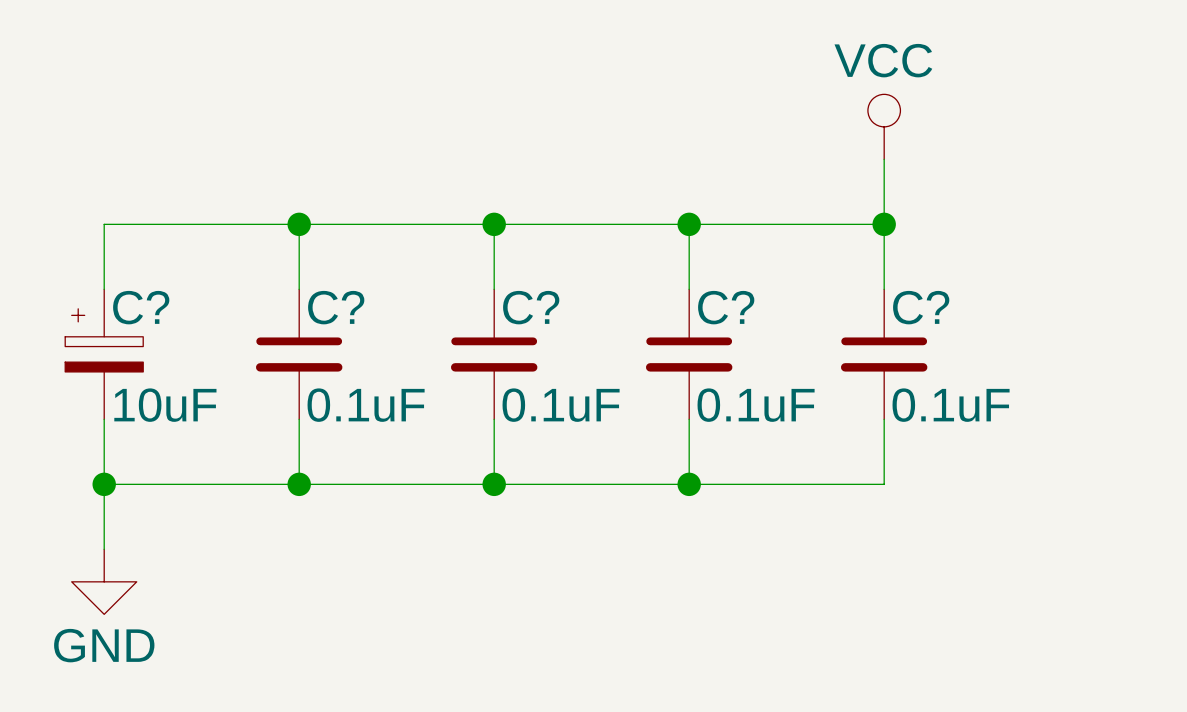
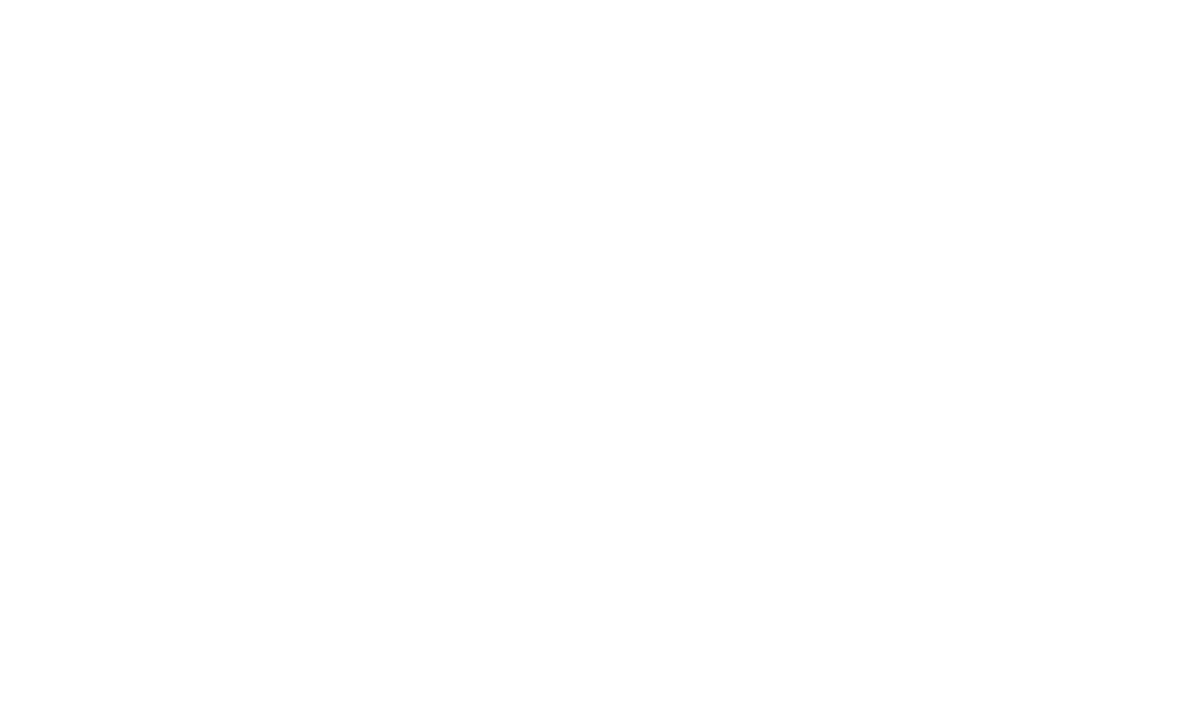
power symbol: VCC (884, 126) -> none
wire: (884, 159) (884, 289) -> none
wire: (299, 224) (299, 289) -> none
junction: (299, 224) -> none
wire: (494, 224) (494, 289) -> none
junction: (494, 224) -> none
wire: (689, 224) (689, 289) -> none
junction: (689, 224) -> none
wire: (884, 224) (104, 224) (104, 289) -> none
junction: (884, 224) -> none
C?: 10uF (104, 354) -> none
C?: 0.1uF (299, 354) -> none
C?: 0.1uF (494, 354) -> none
C?: 0.1uF (689, 354) -> none
C?: 0.1uF (884, 354) -> none
wire: (104, 419) (104, 549) -> none
wire: (299, 419) (299, 484) -> none
wire: (494, 419) (494, 484) -> none
wire: (689, 419) (689, 484) -> none
wire: (884, 419) (884, 484) (104, 484) -> none
junction: (104, 484) -> none
junction: (299, 484) -> none
junction: (494, 484) -> none
junction: (689, 484) -> none
power symbol: GND (104, 581) -> none

